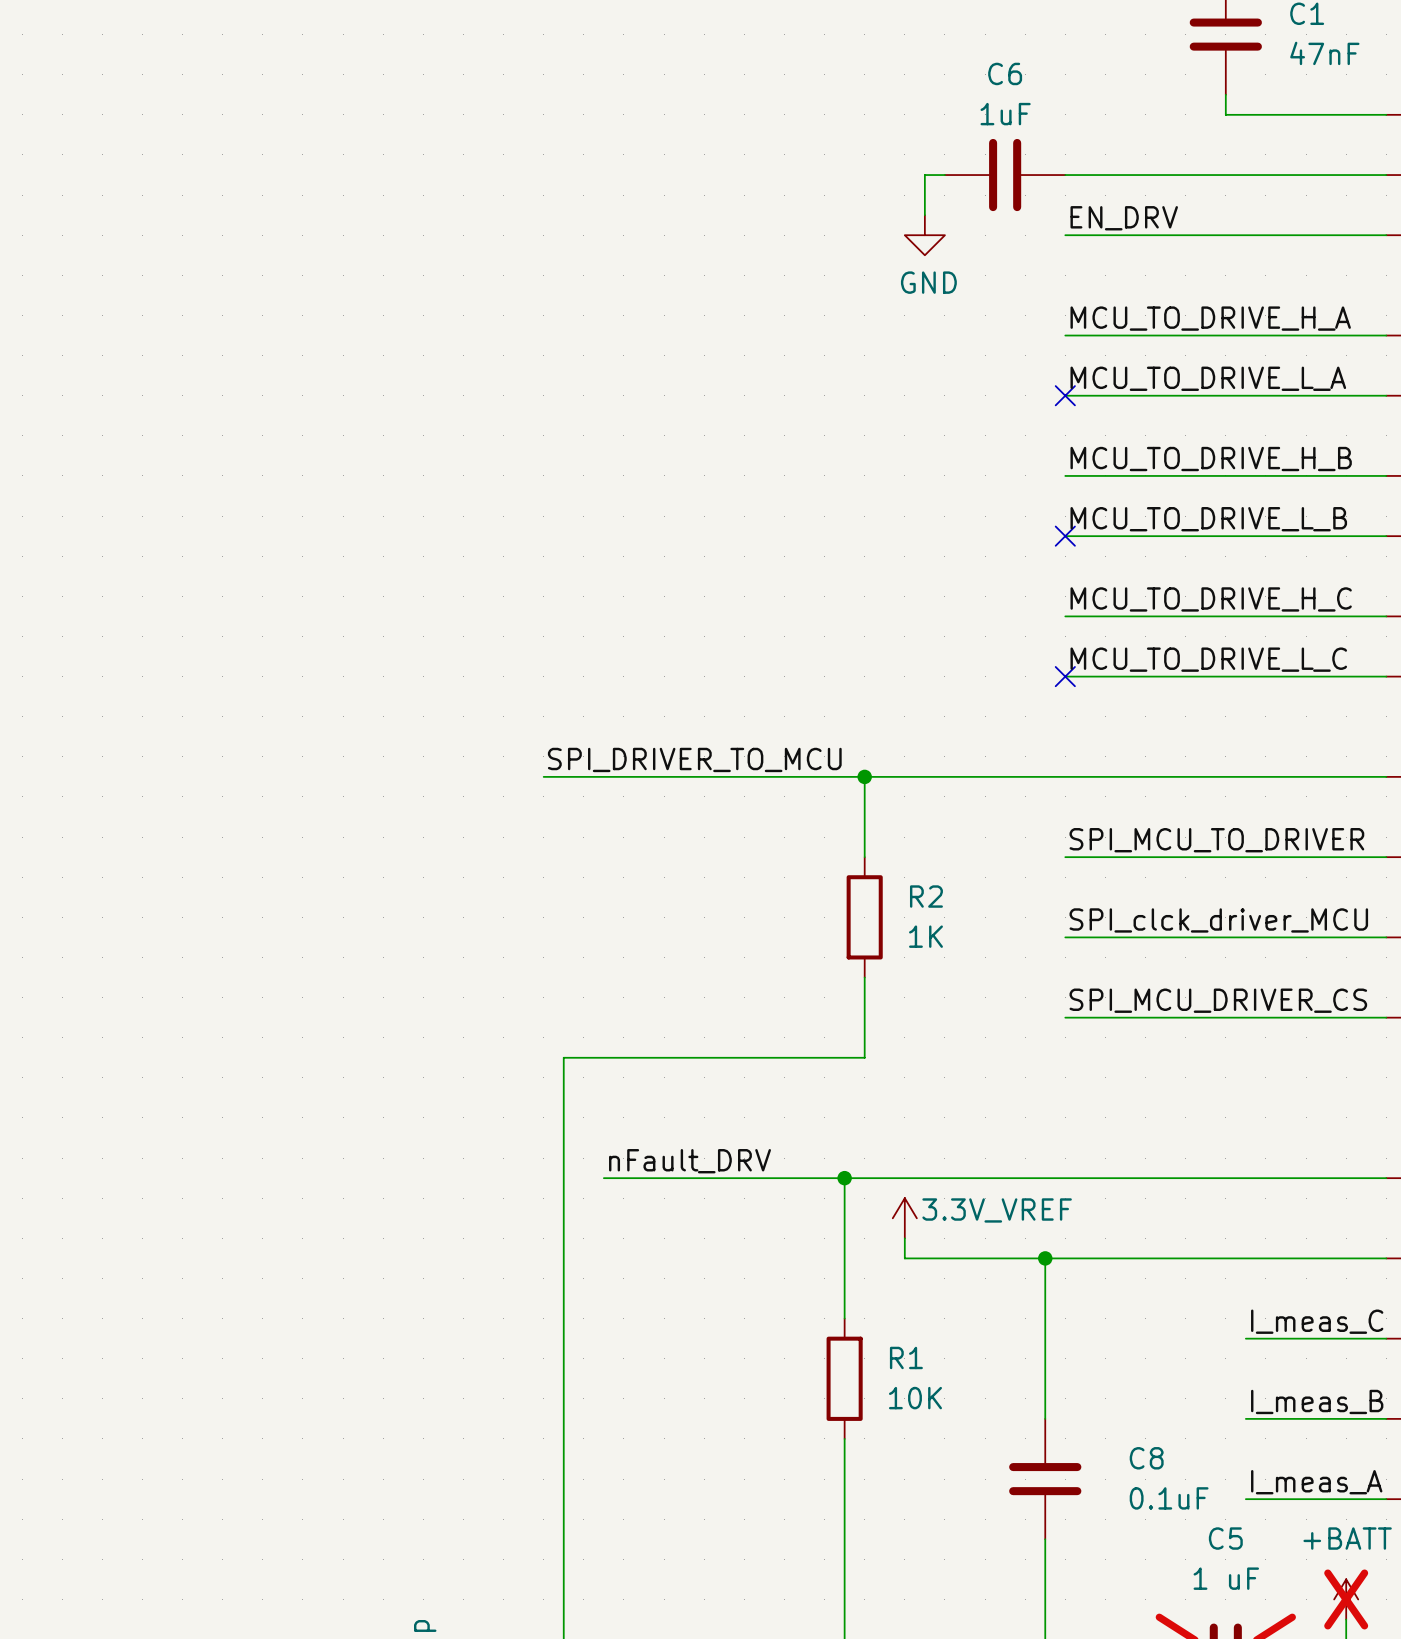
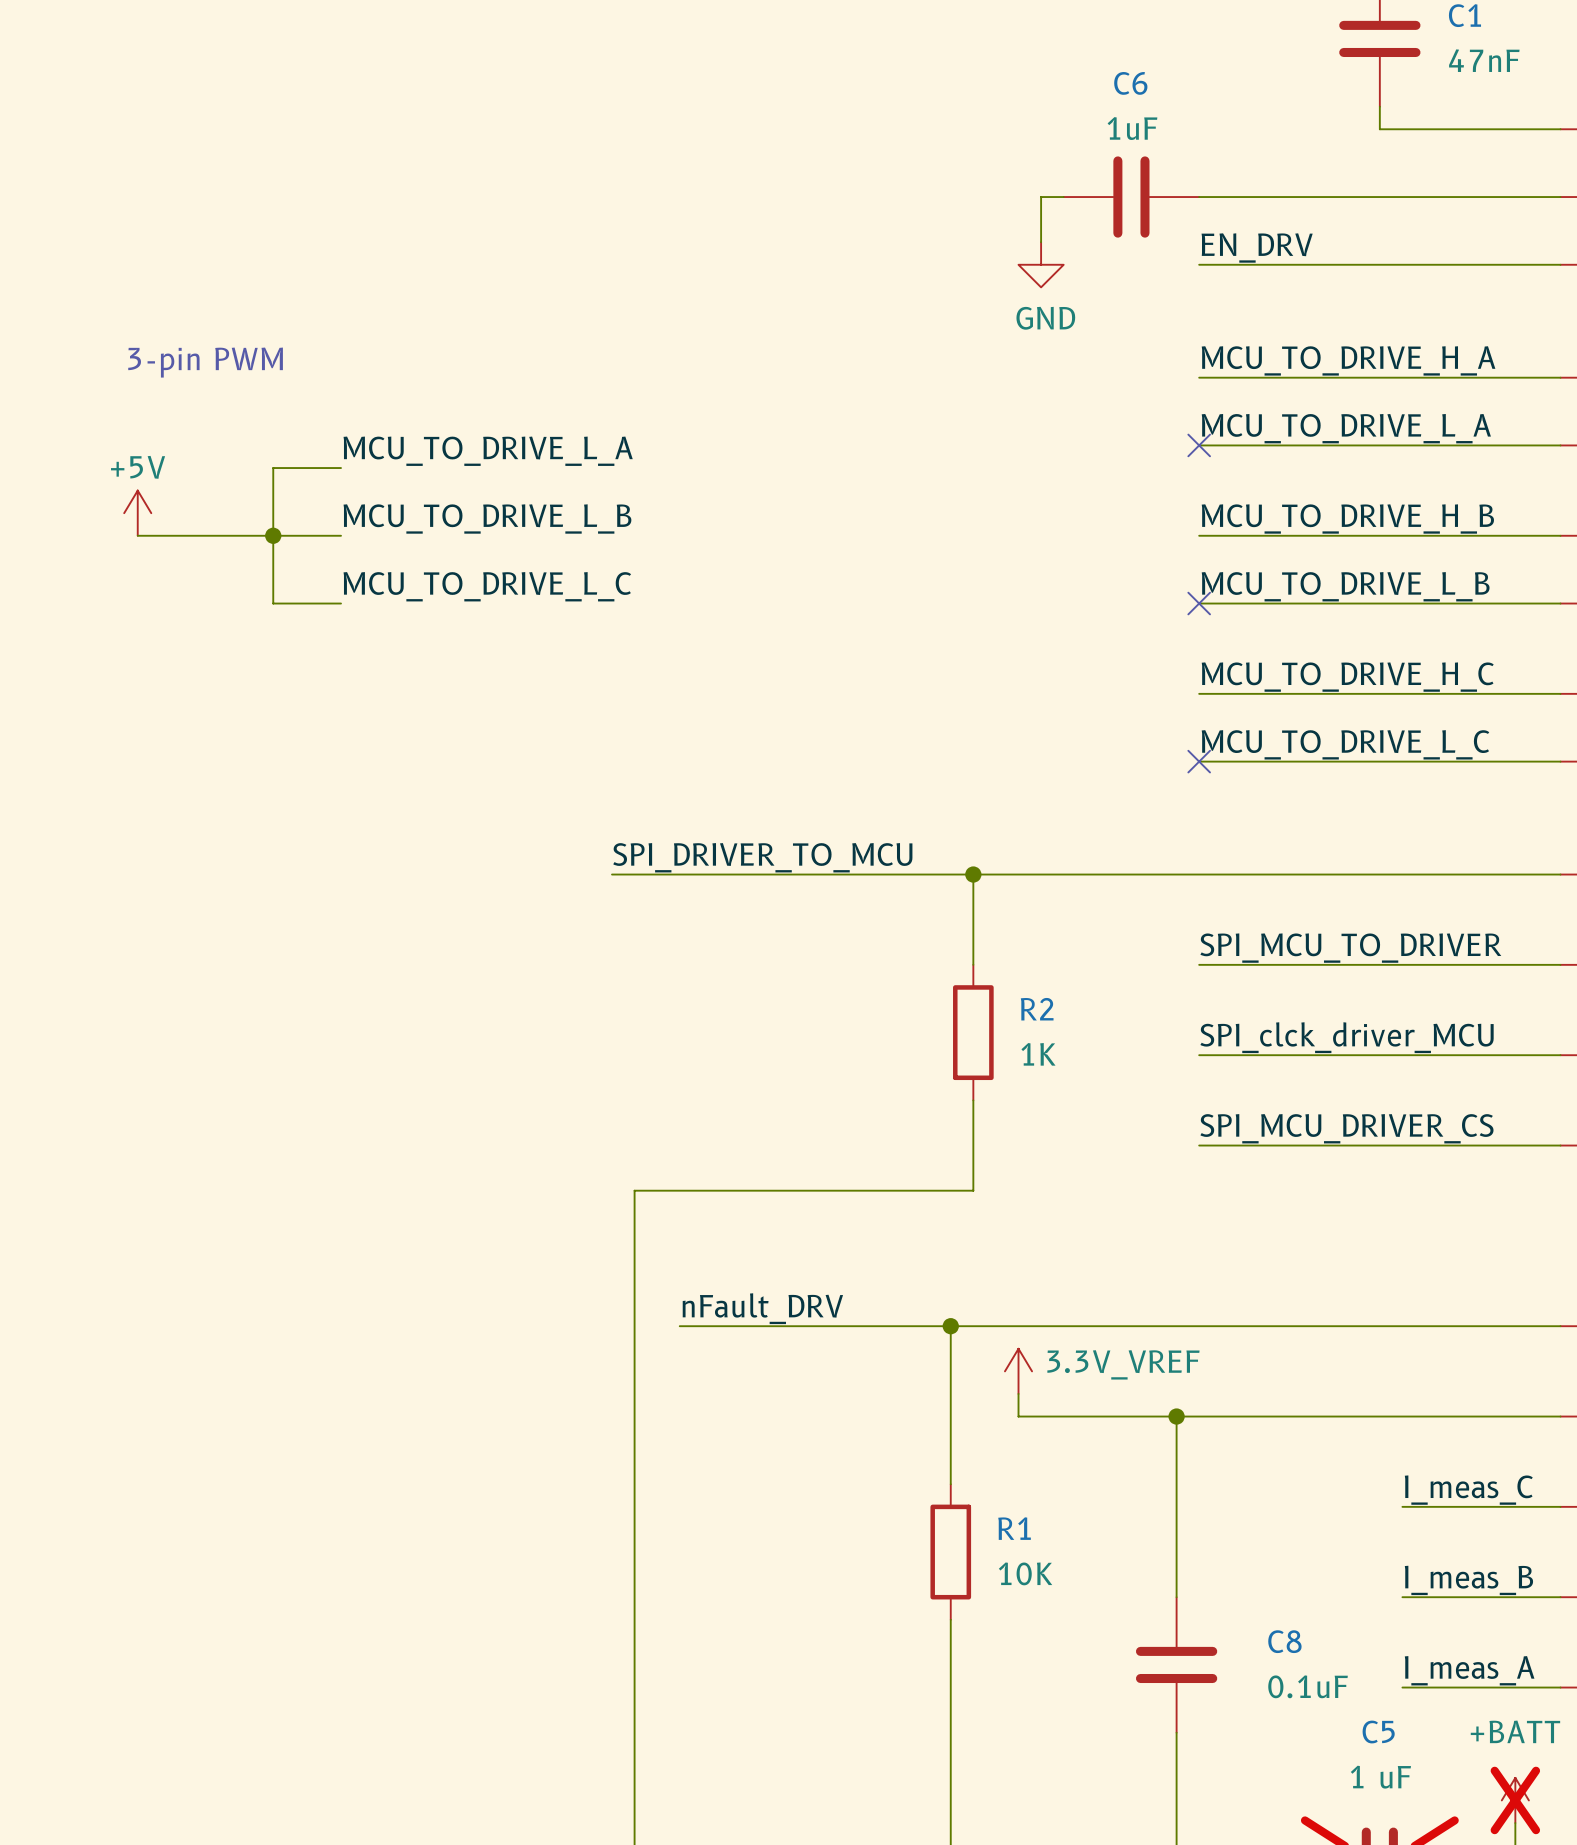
text: none -> 3-pin PWM (205, 362)
label: none -> MCU_TO_DRIVE_L_A (488, 451)
wire: none -> (341, 468) (273, 468) (273, 603) (341, 603)
power symbol: none -> +5V (137, 513)
label: none -> MCU_TO_DRIVE_L_B (487, 519)
wire: none -> (137, 535) (341, 535)
junction: none -> (273, 535)
label: none -> MCU_TO_DRIVE_L_C (487, 586)

